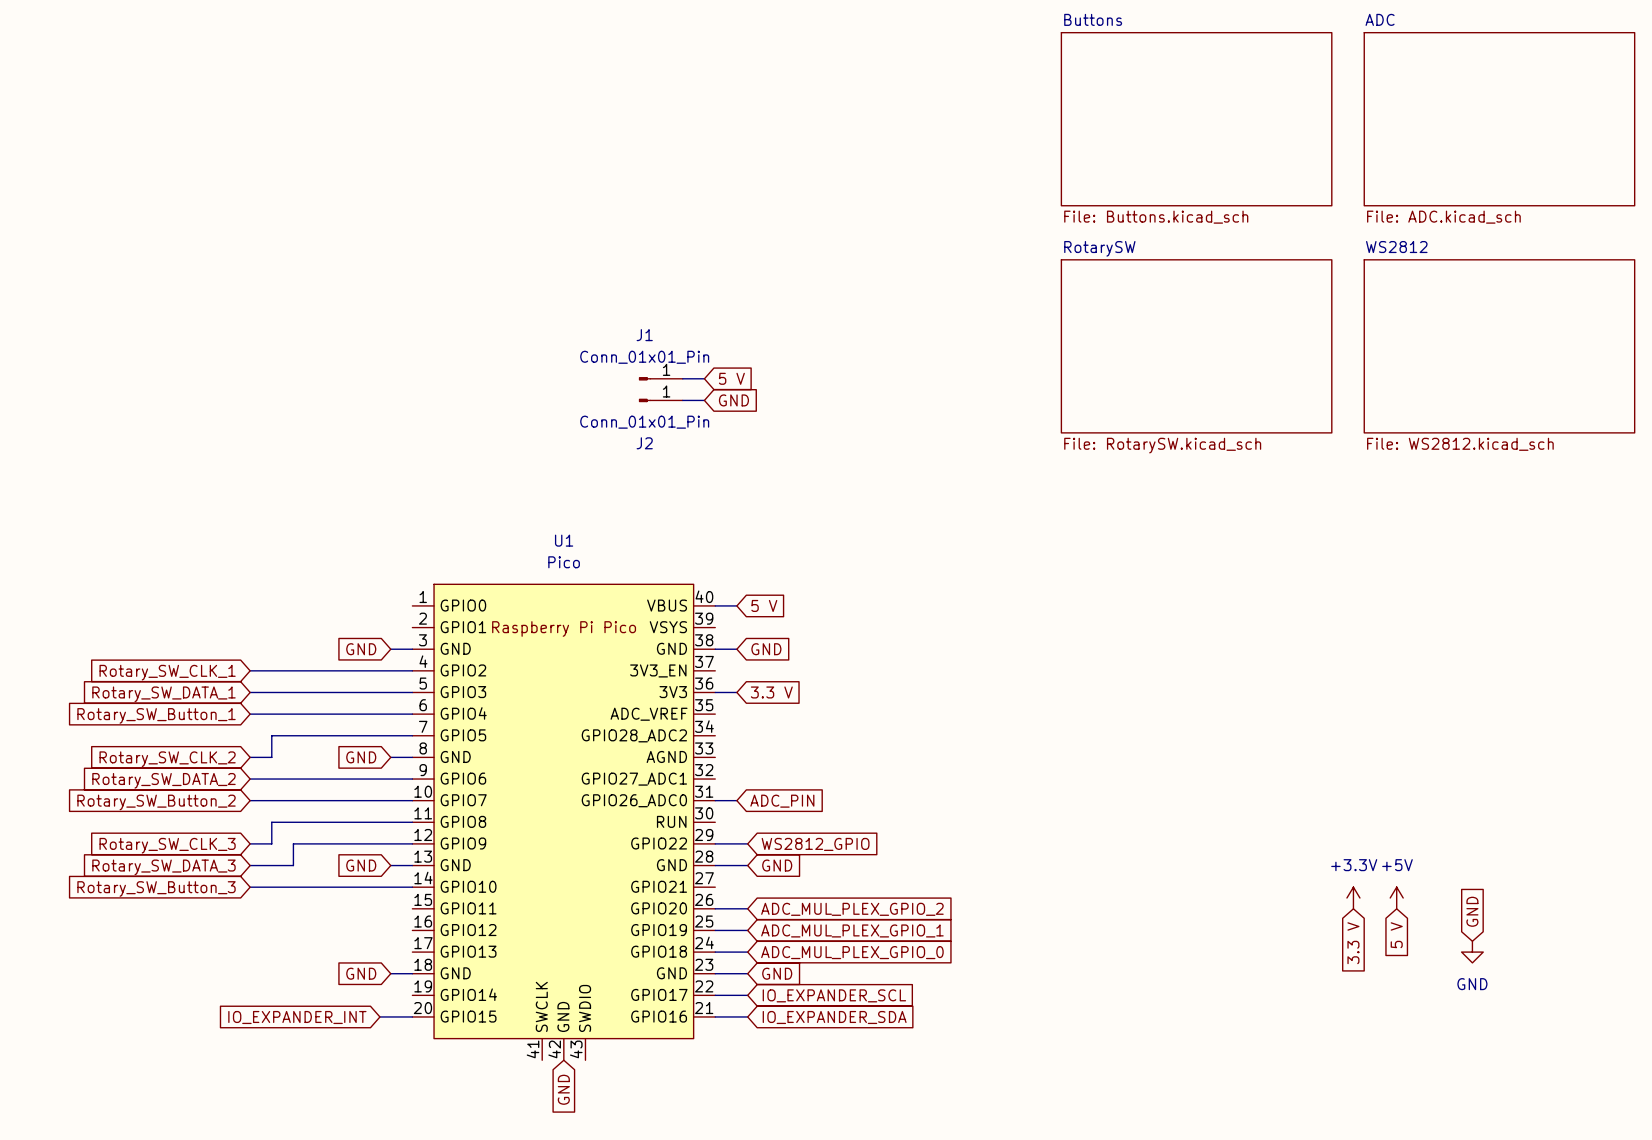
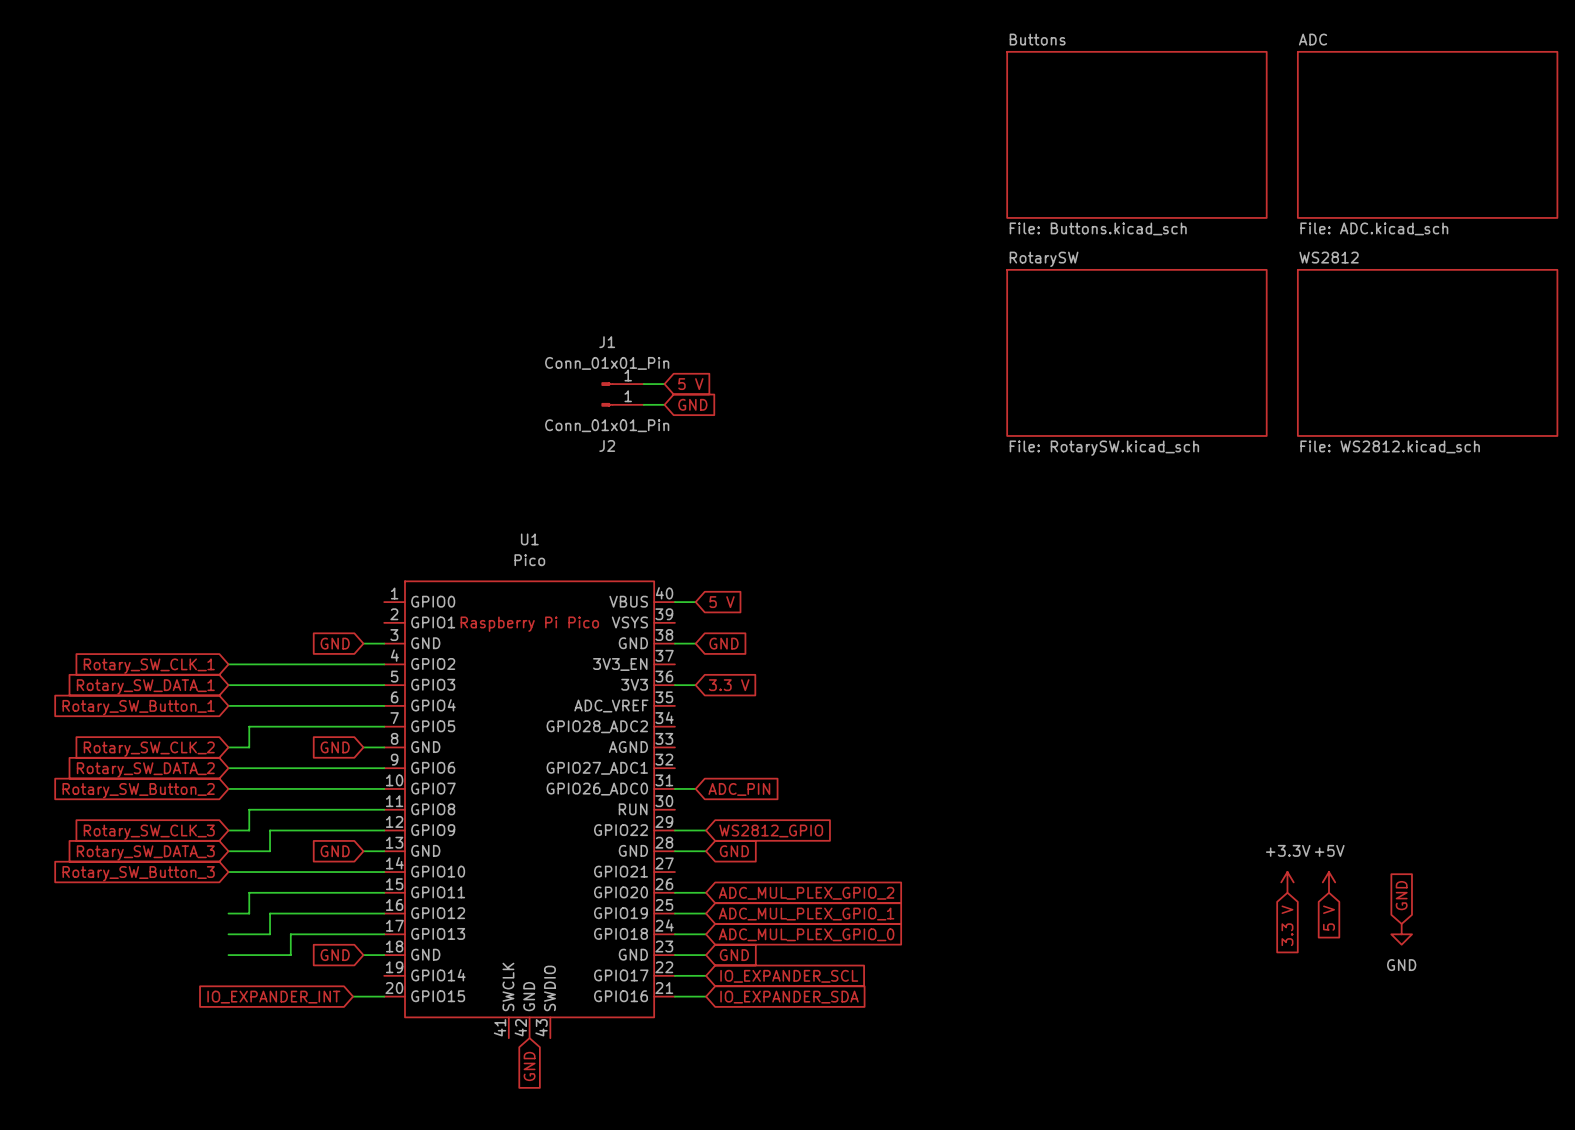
wire: none -> (384, 892) (249, 892) (249, 913) (228, 913)
wire: none -> (384, 913) (270, 913) (270, 934) (228, 934)
wire: none -> (384, 934) (290, 934) (290, 955) (228, 955)

